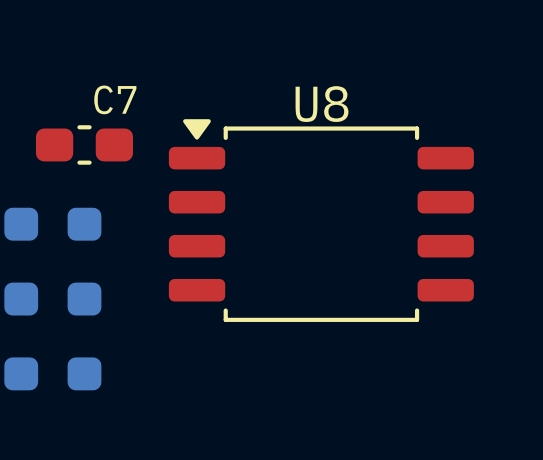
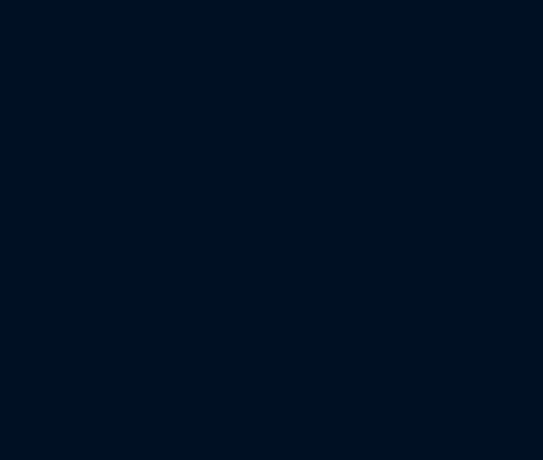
C7: (84, 144) -> none
U8: (321, 220) -> none
part: (52, 224) -> none
part: (52, 299) -> none
part: (52, 373) -> none

